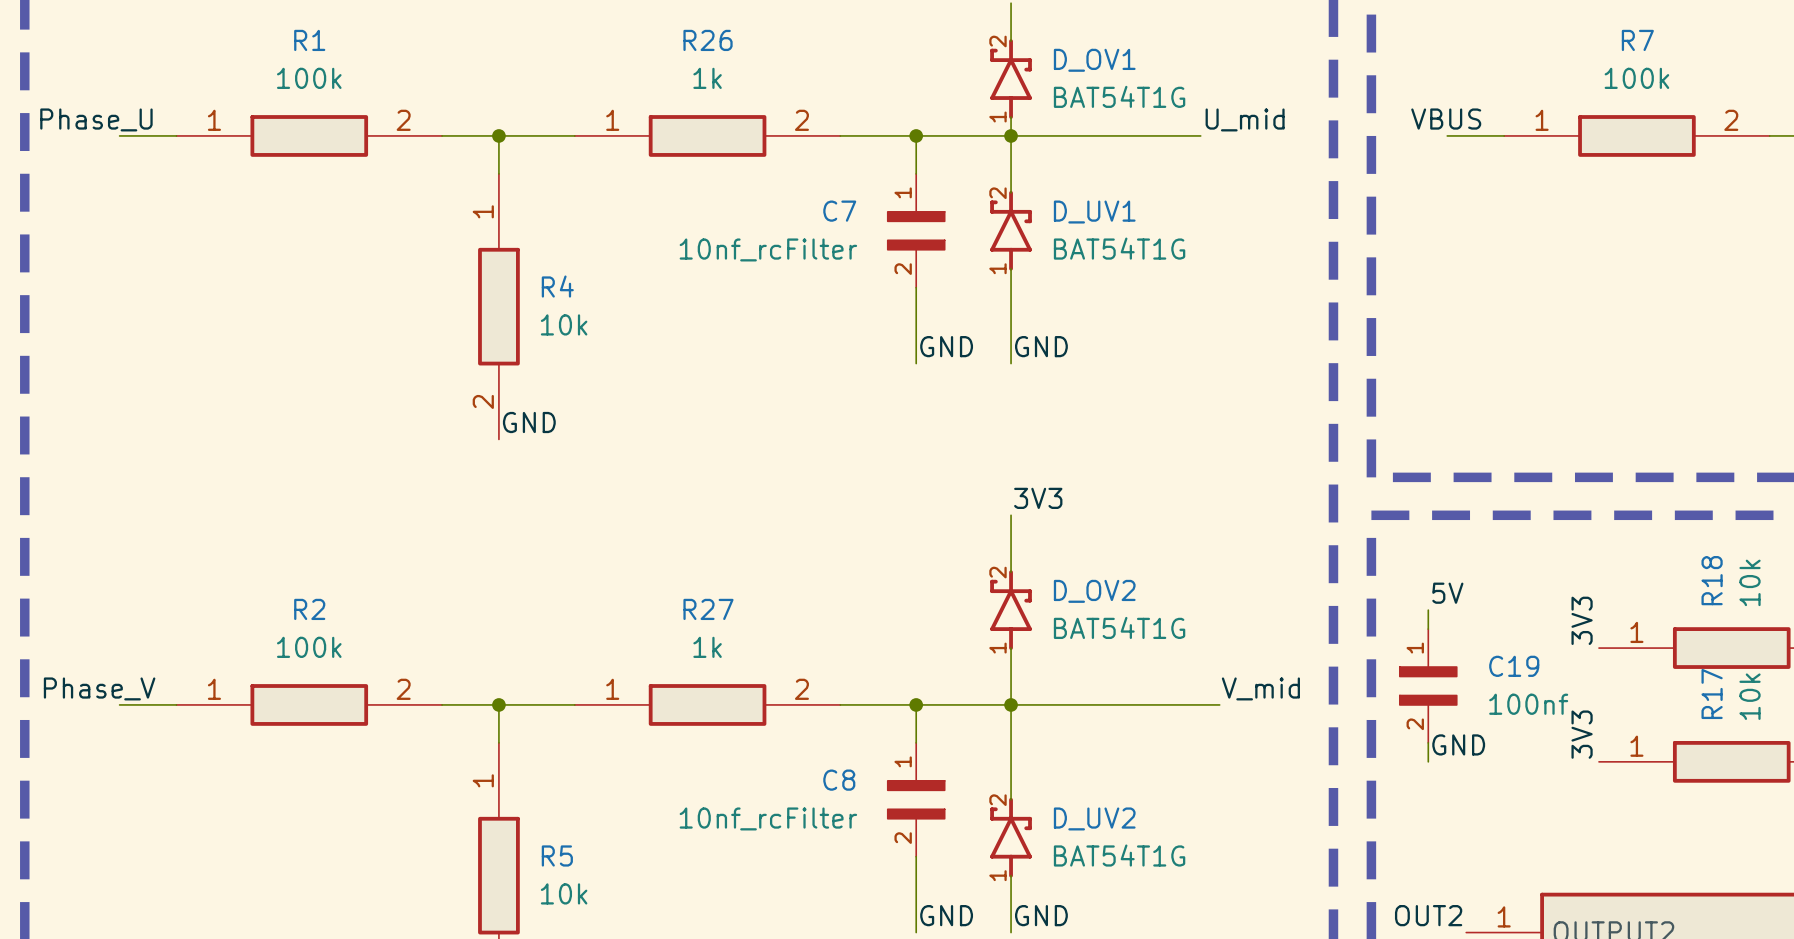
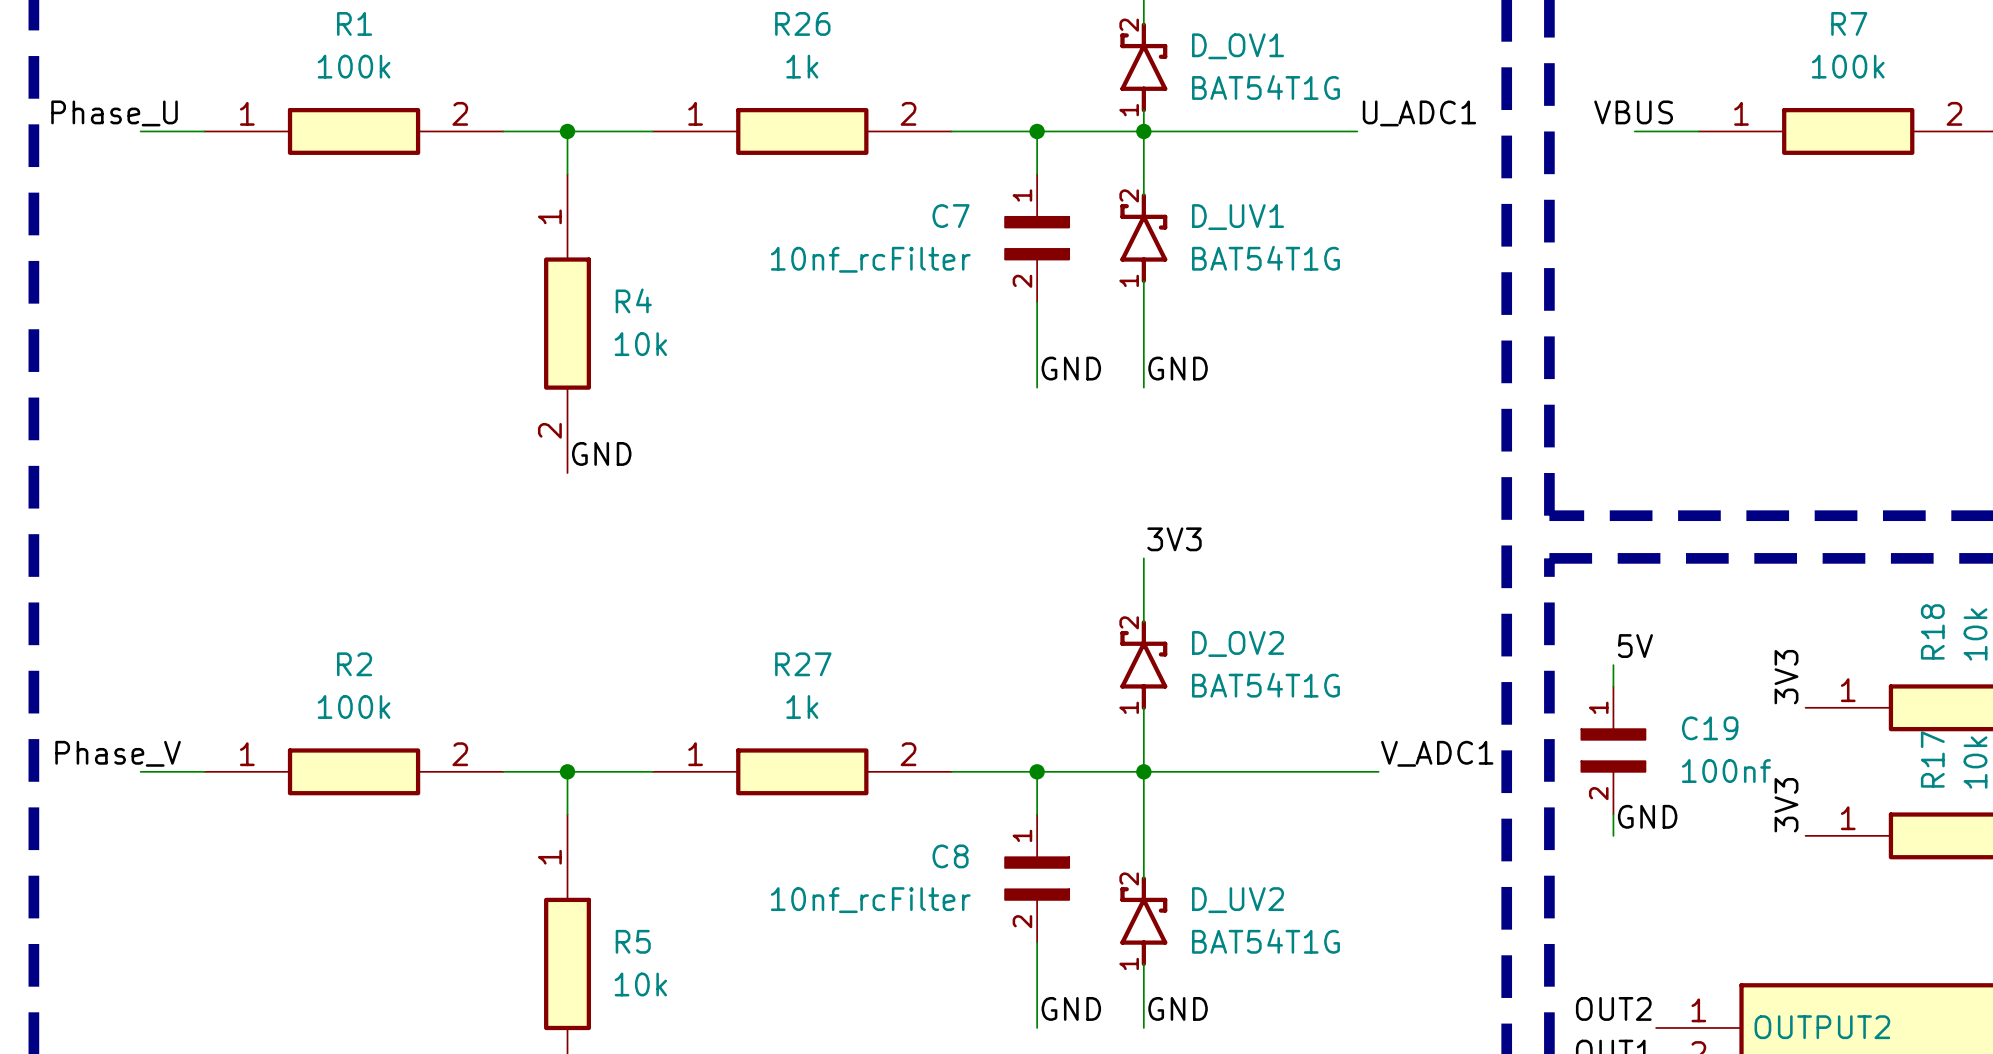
label: U_mid (1245, 119) -> U_ADC1 (1419, 113)
label: V_mid (1260, 688) -> V_ADC1 (1437, 753)

